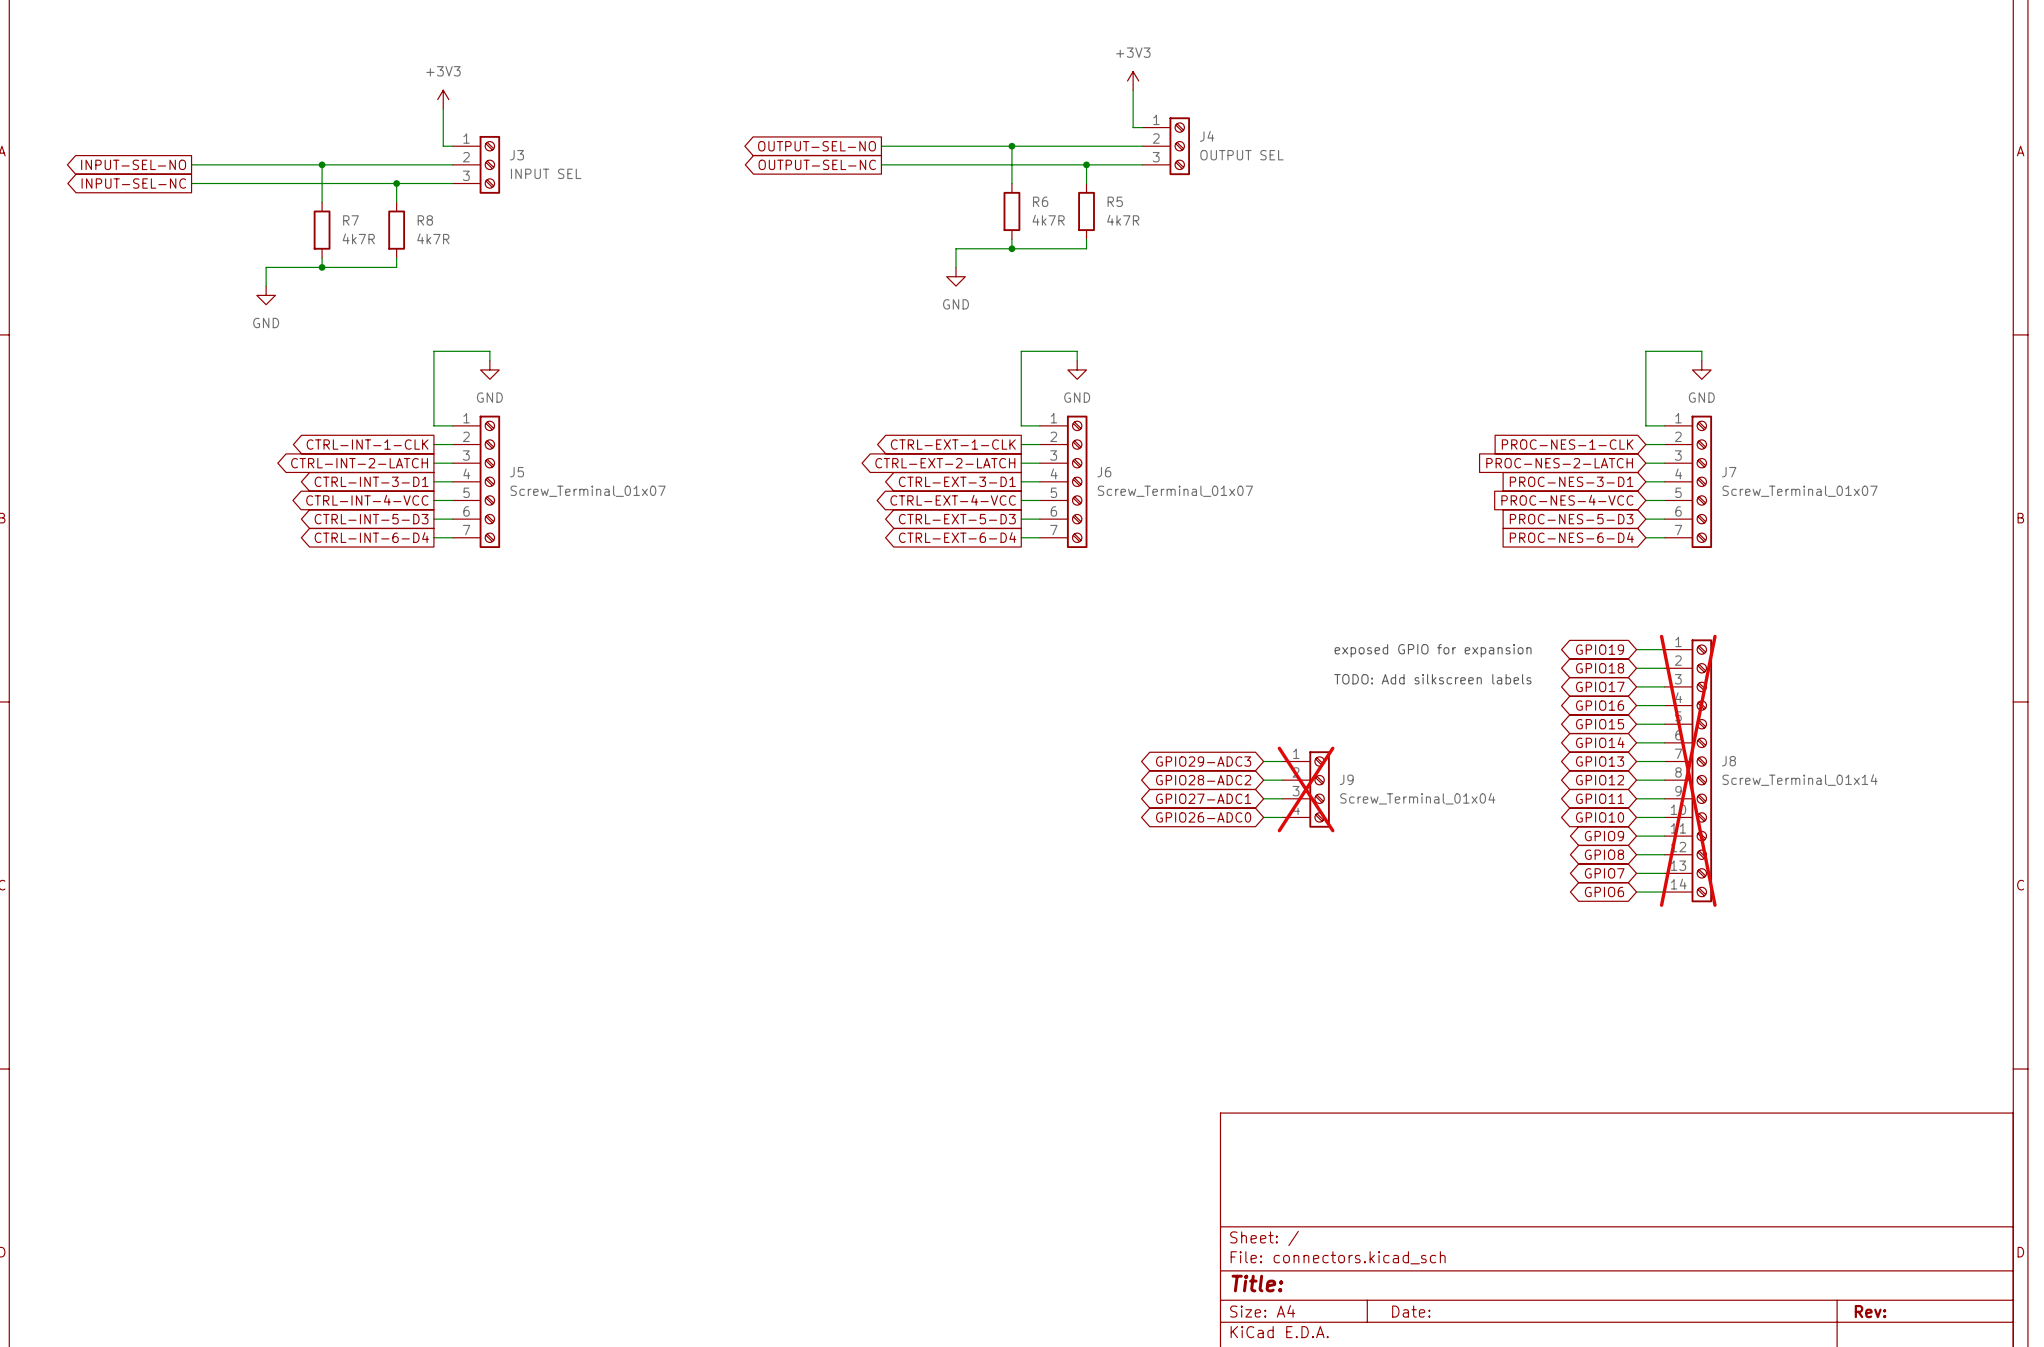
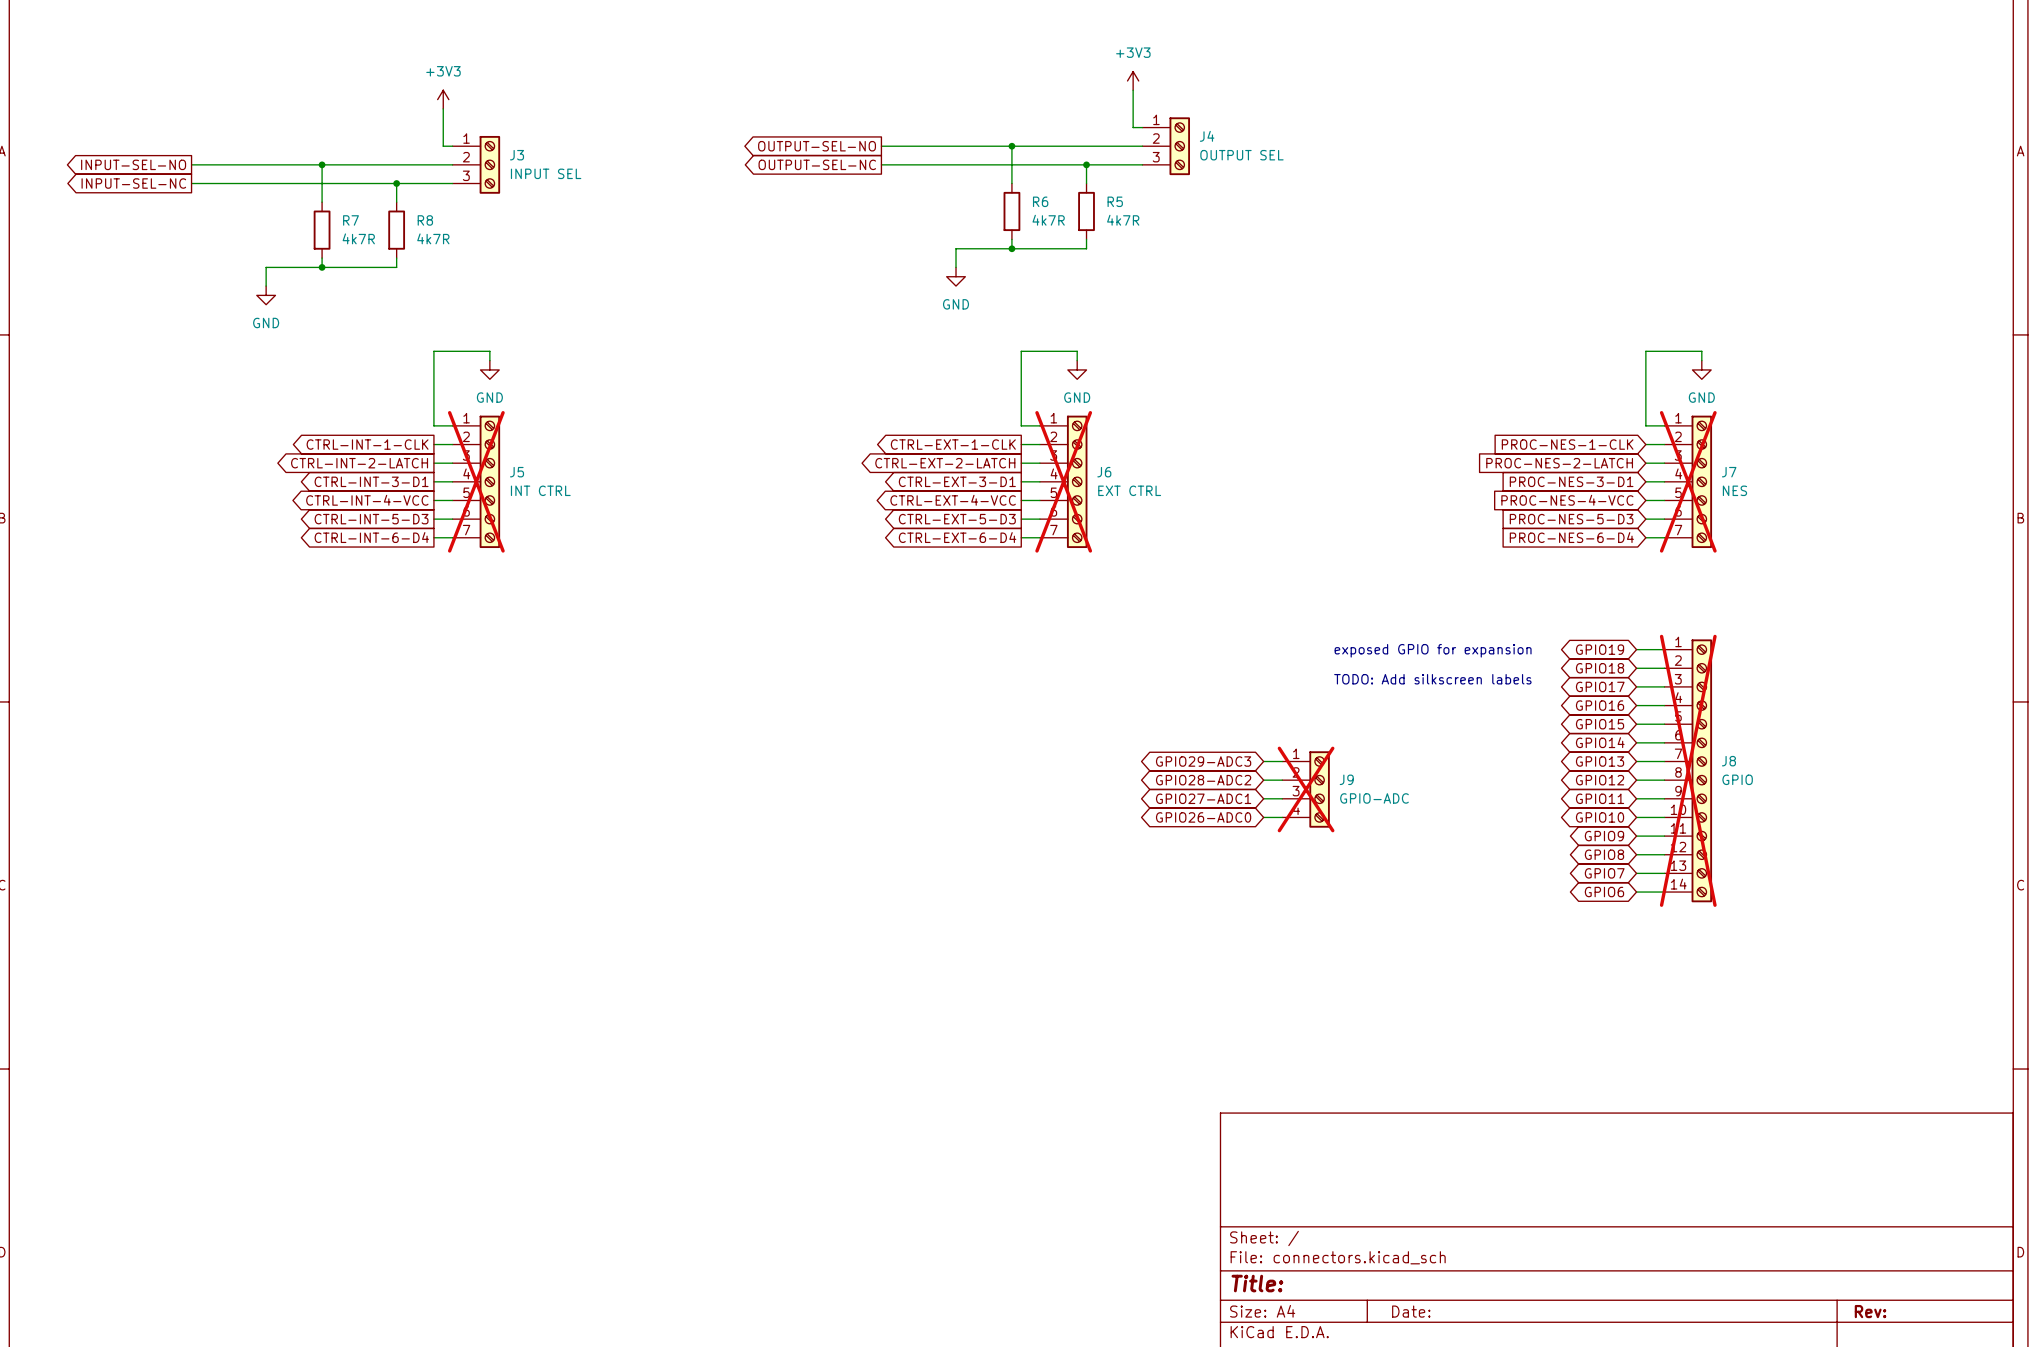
J5 do-not-place cross: none -> (476, 481)
J6 do-not-place cross: none -> (1063, 481)
J7 do-not-place cross: none -> (1688, 481)
J5 value: Screw_Terminal_01x07 (588, 491) -> INT CTRL (540, 490)
J6 value: Screw_Terminal_01x07 (1175, 491) -> EXT CTRL (1129, 490)
J7 value: Screw_Terminal_01x07 (1799, 491) -> NES (1734, 490)
J8 value: Screw_Terminal_01x14 (1799, 780) -> GPIO (1737, 779)
J9 value: Screw_Terminal_01x04 (1417, 798) -> GPIO-ADC (1374, 798)

